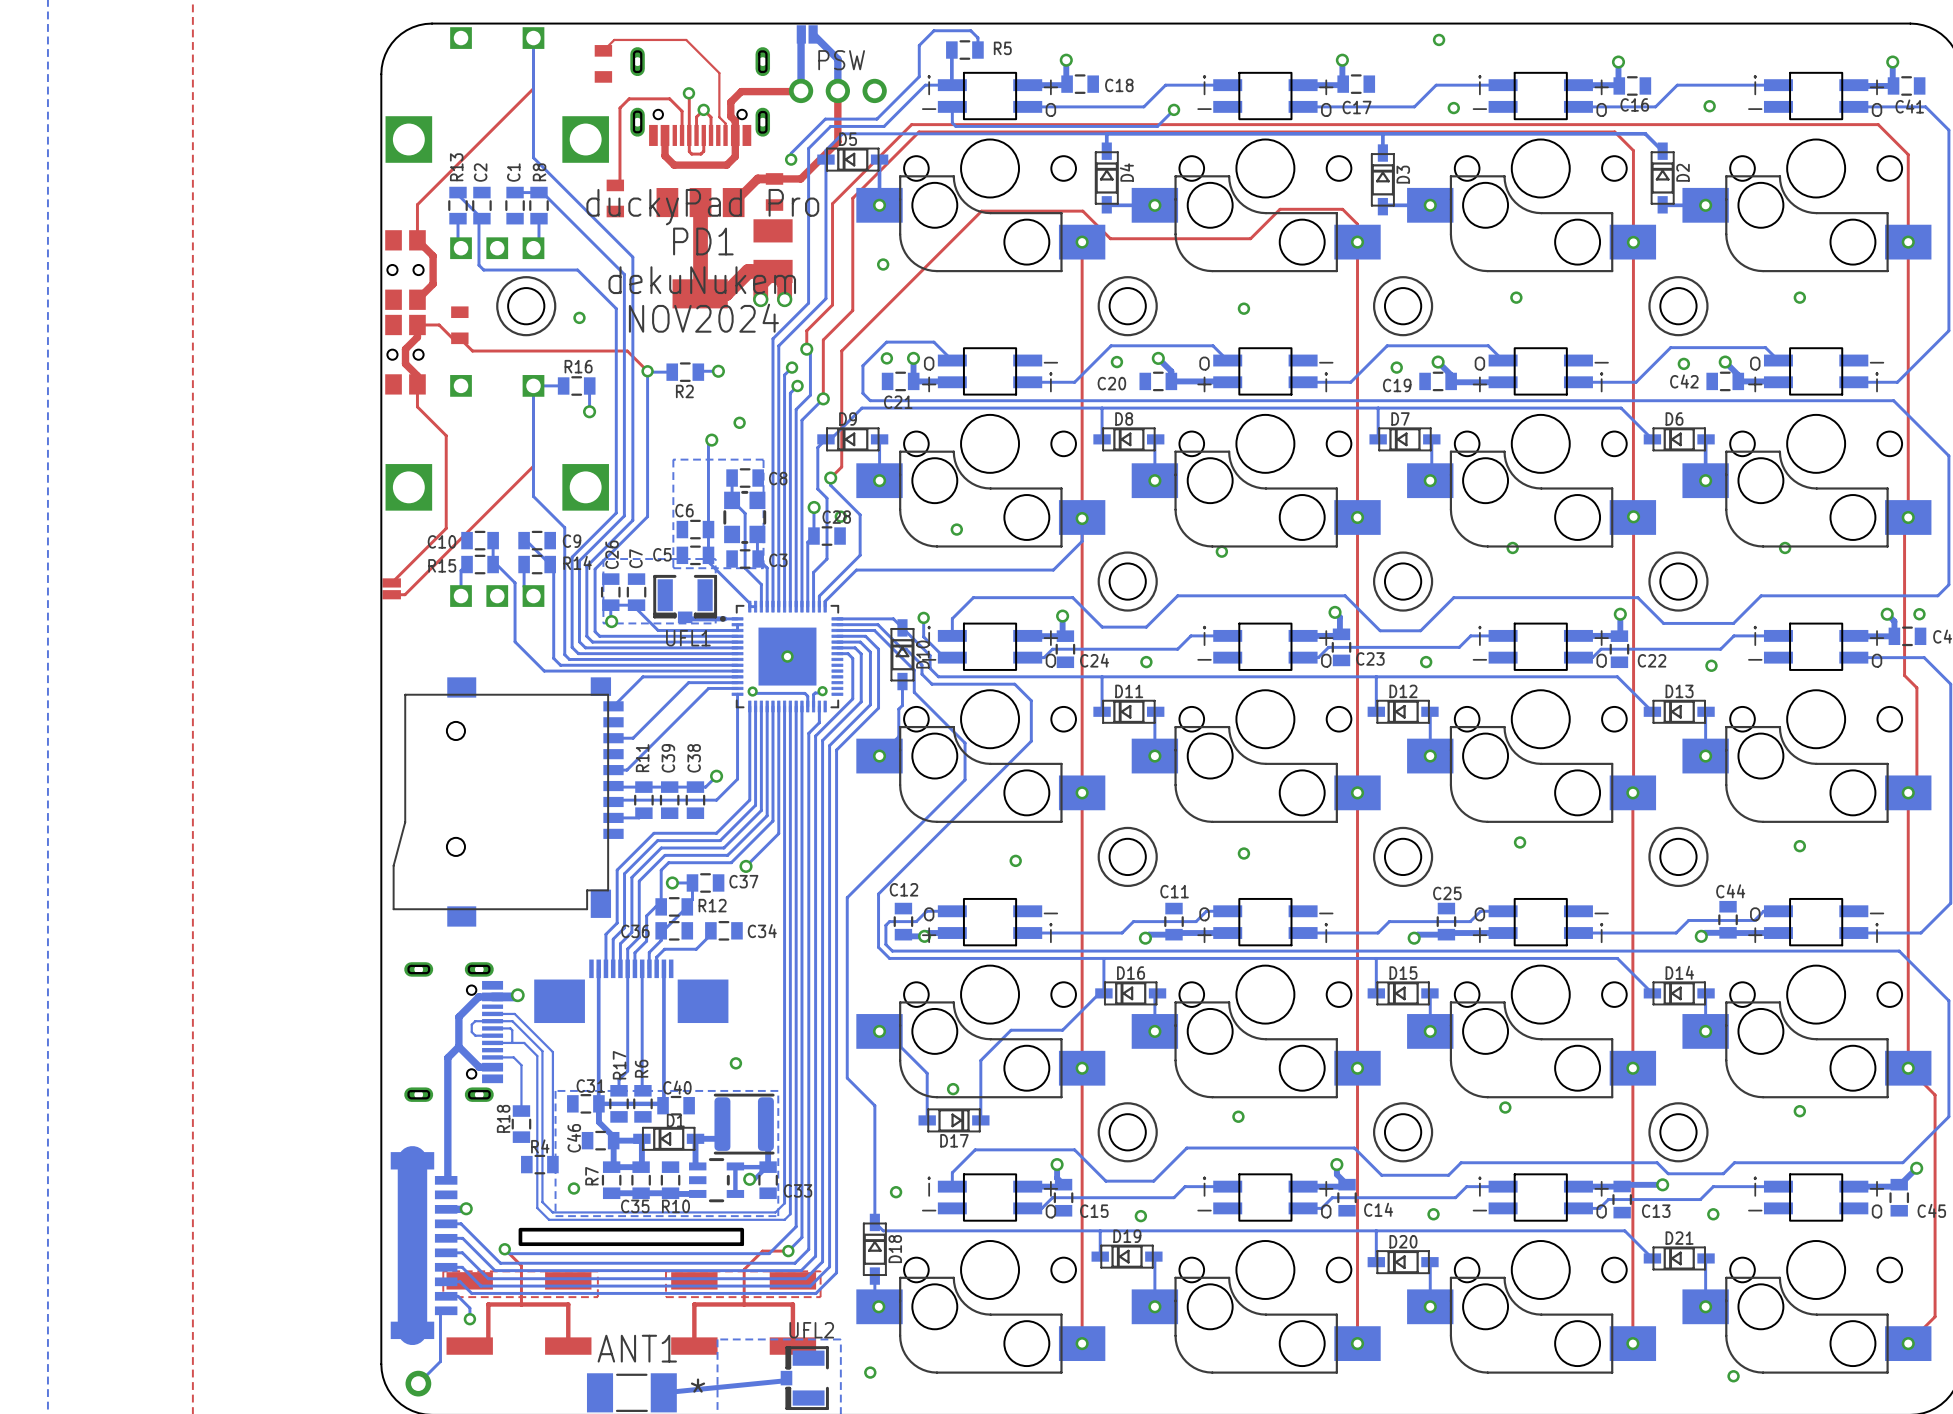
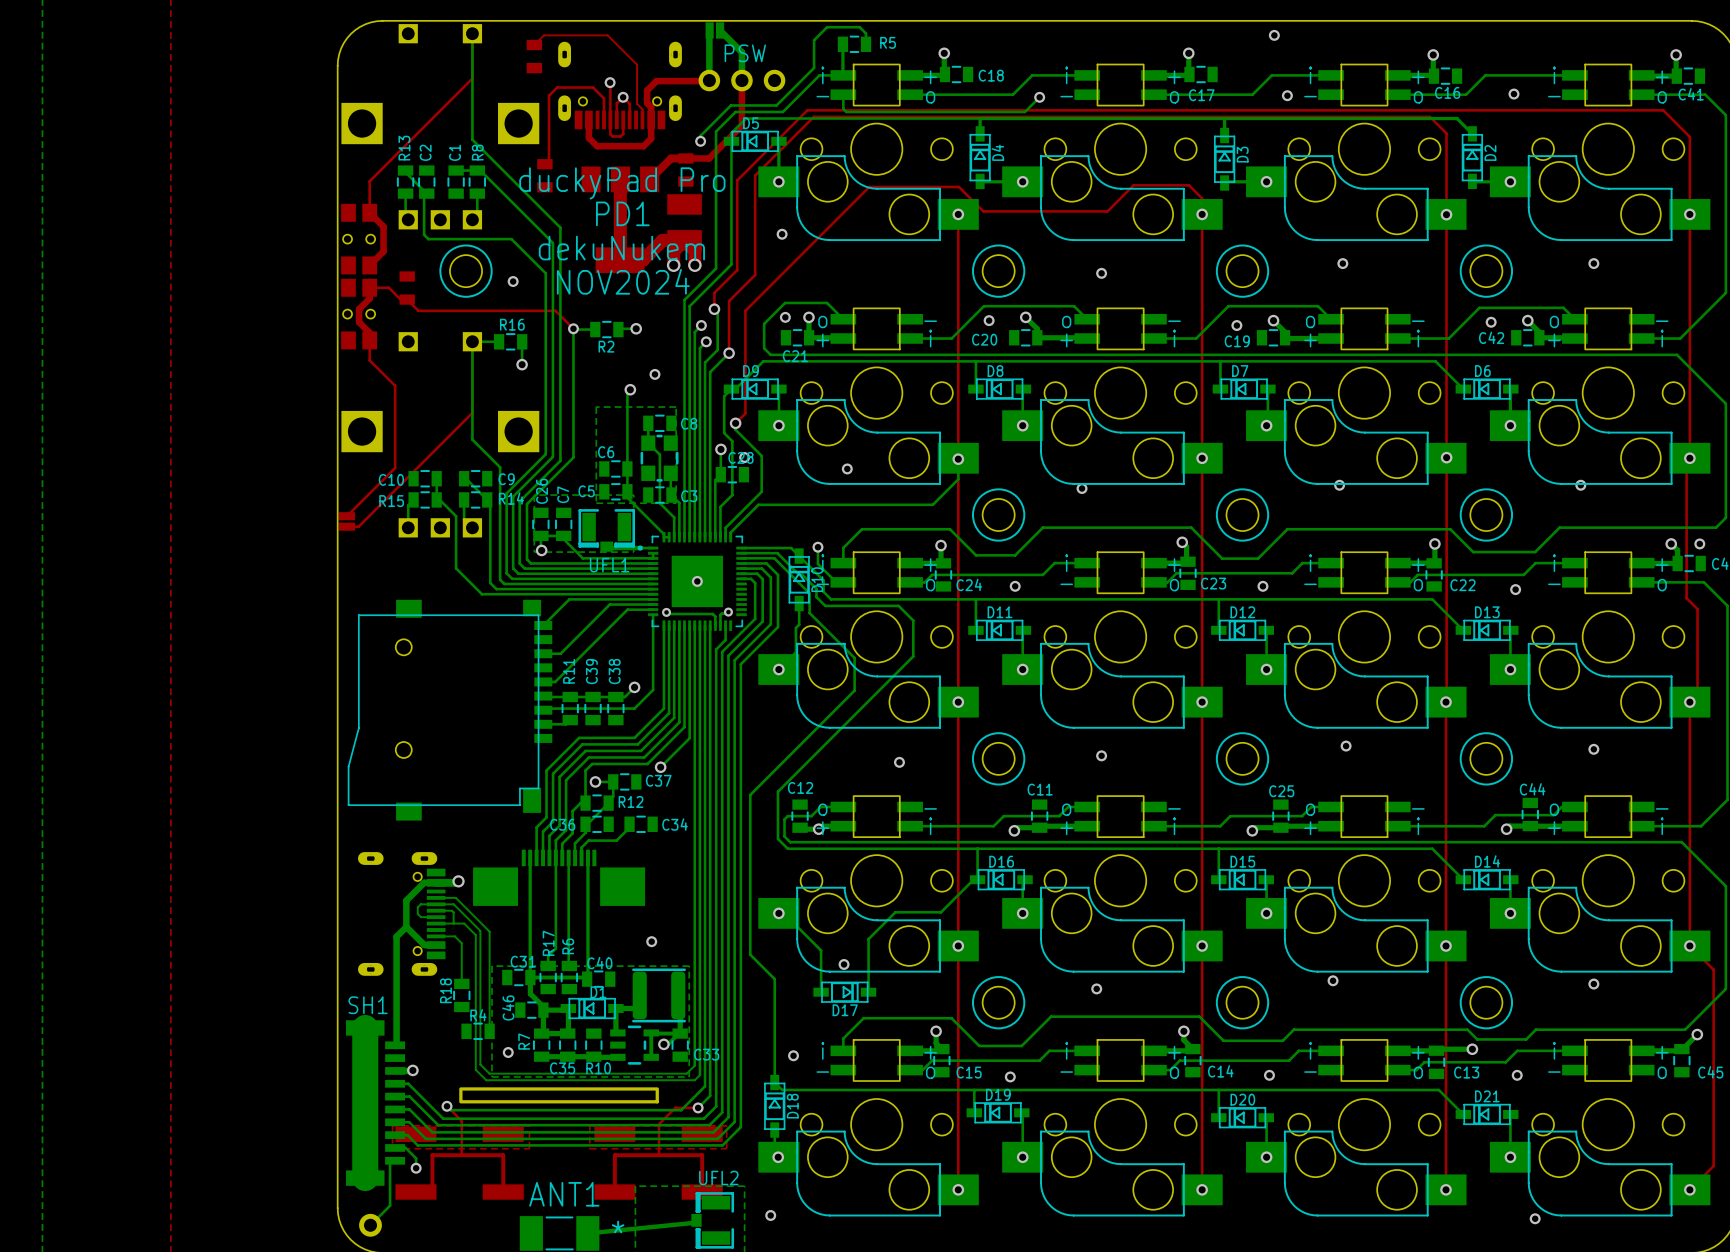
text: none -> SH1 (368, 1005)

